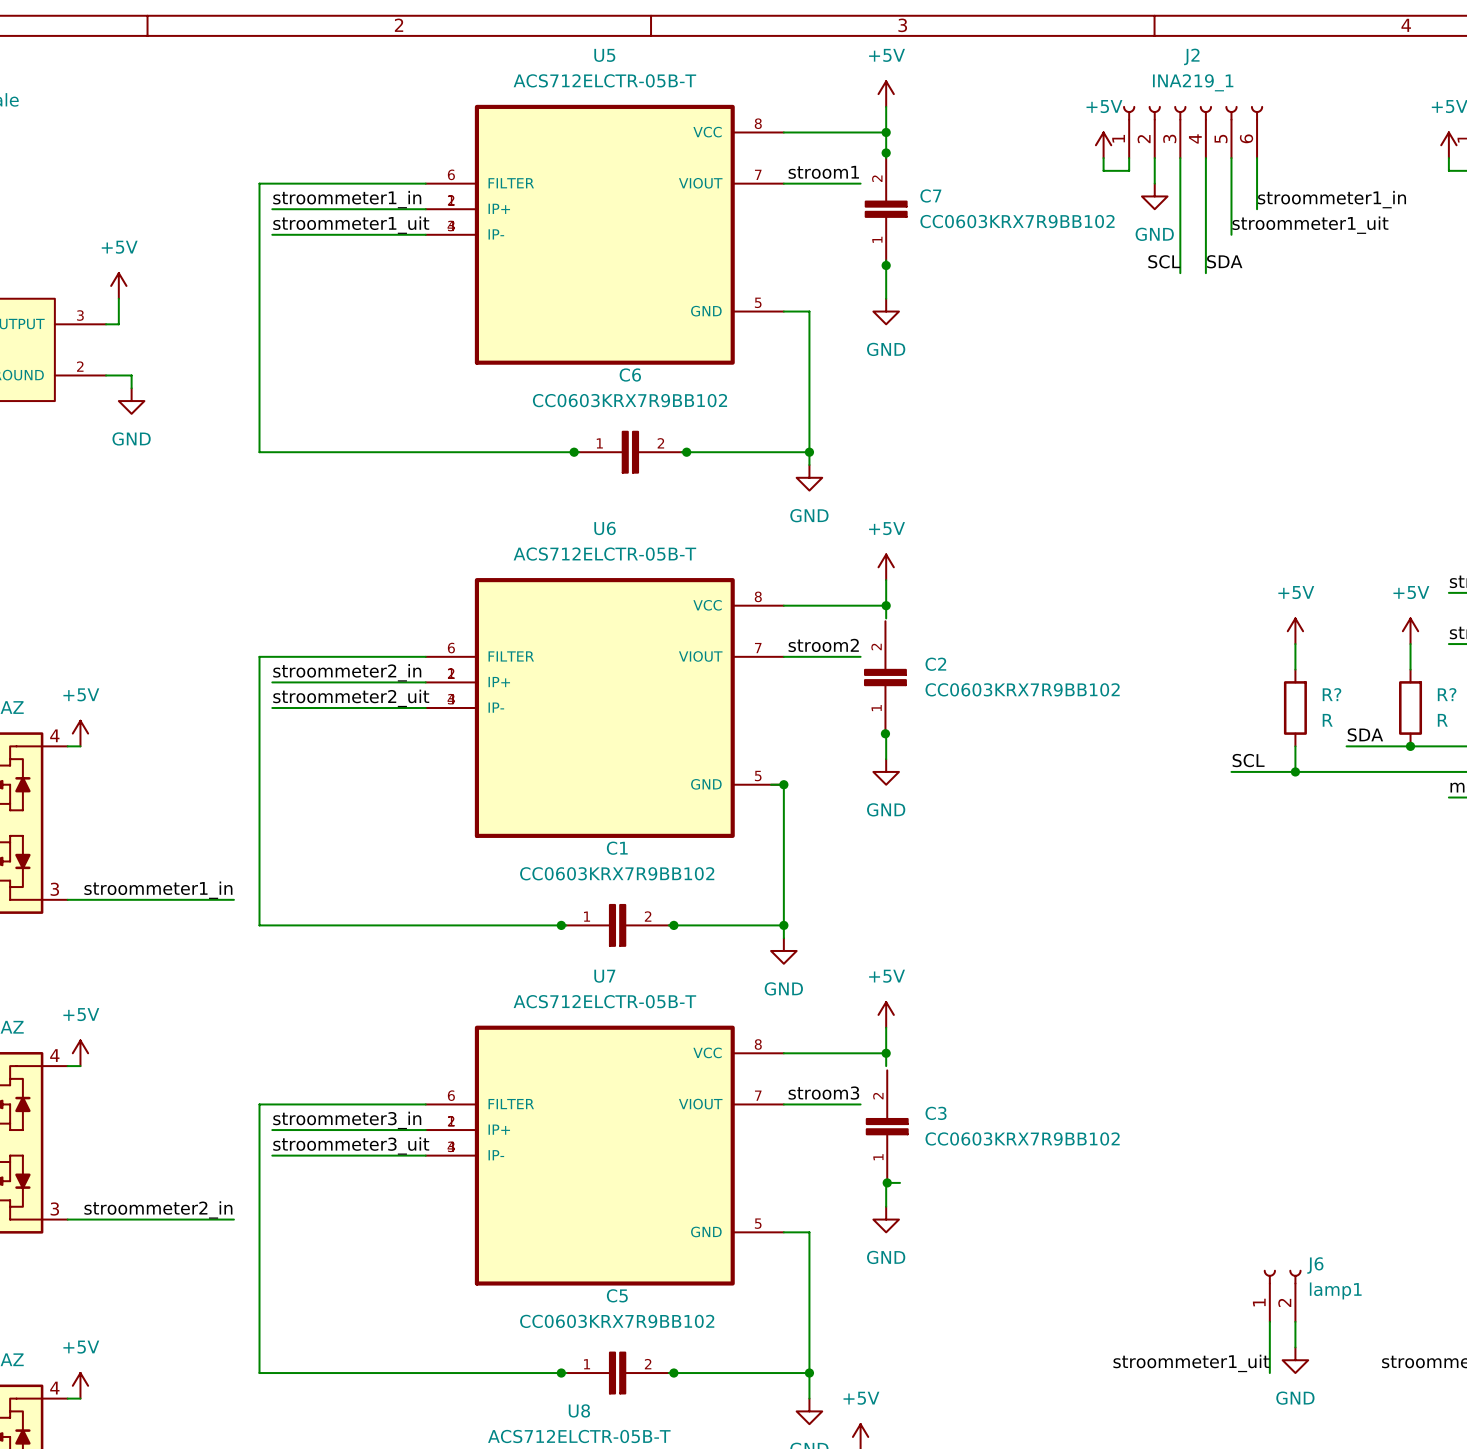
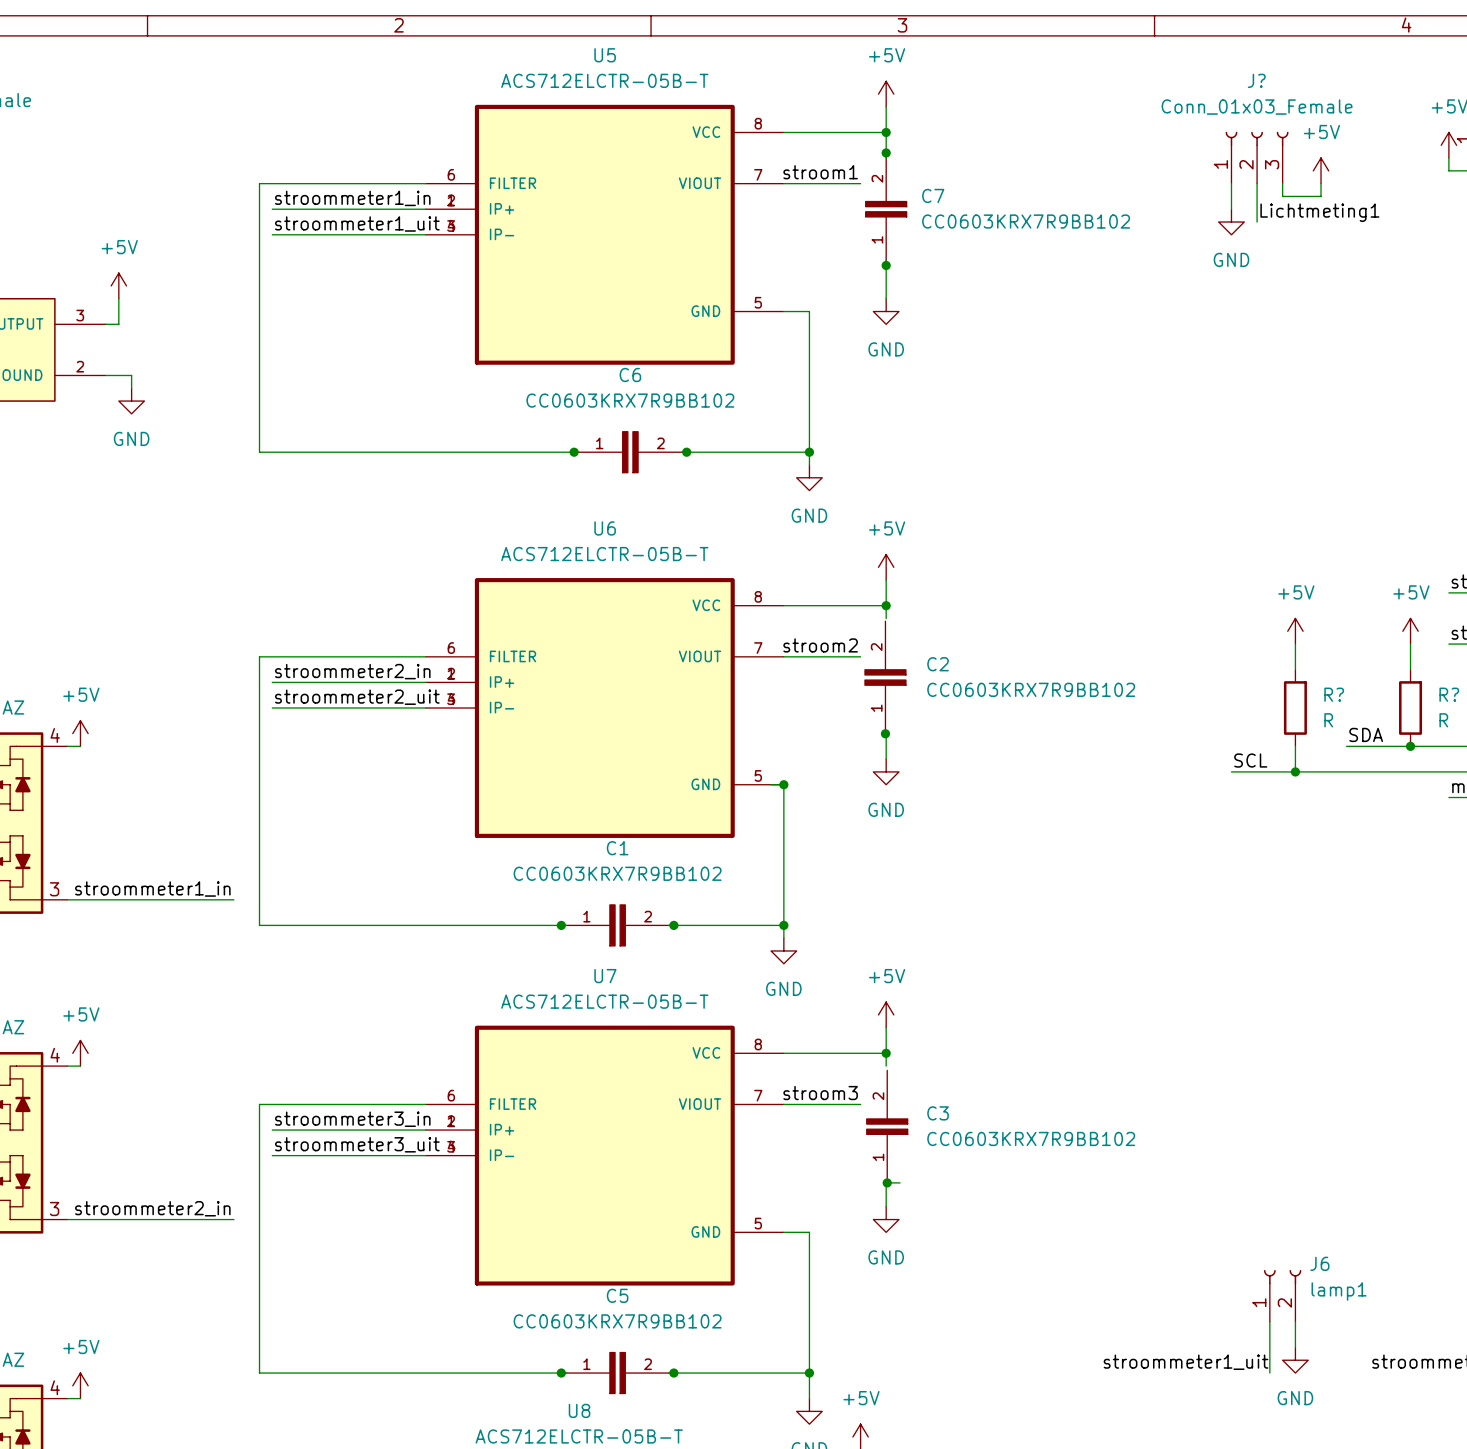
J2: INA219_1 (1193, 132) -> none
power symbol position: +5V (1103, 145) -> +5V (1321, 170)
J?: none -> Conn_01x03_Female (1257, 157)
wire: (1103, 158) (1103, 170) (1129, 170) (1129, 158) -> none
wire: (1154, 158) (1154, 183) -> none
wire: (1180, 158) (1180, 273) -> none
wire: (1205, 158) (1205, 273) -> none
wire: none -> (1282, 183) (1282, 196) (1321, 196) (1321, 183)
power symbol position: GND (1154, 196) -> GND (1231, 222)
label: stroommeter1_in (1332, 199) -> none
wire: none -> (1257, 209) (1257, 222)
label: none -> Lichtmeting1 (1319, 212)
label: stroommeter1_uit (1310, 225) -> none
label: SCL (1164, 261) -> none
label: SDA (1224, 261) -> none

